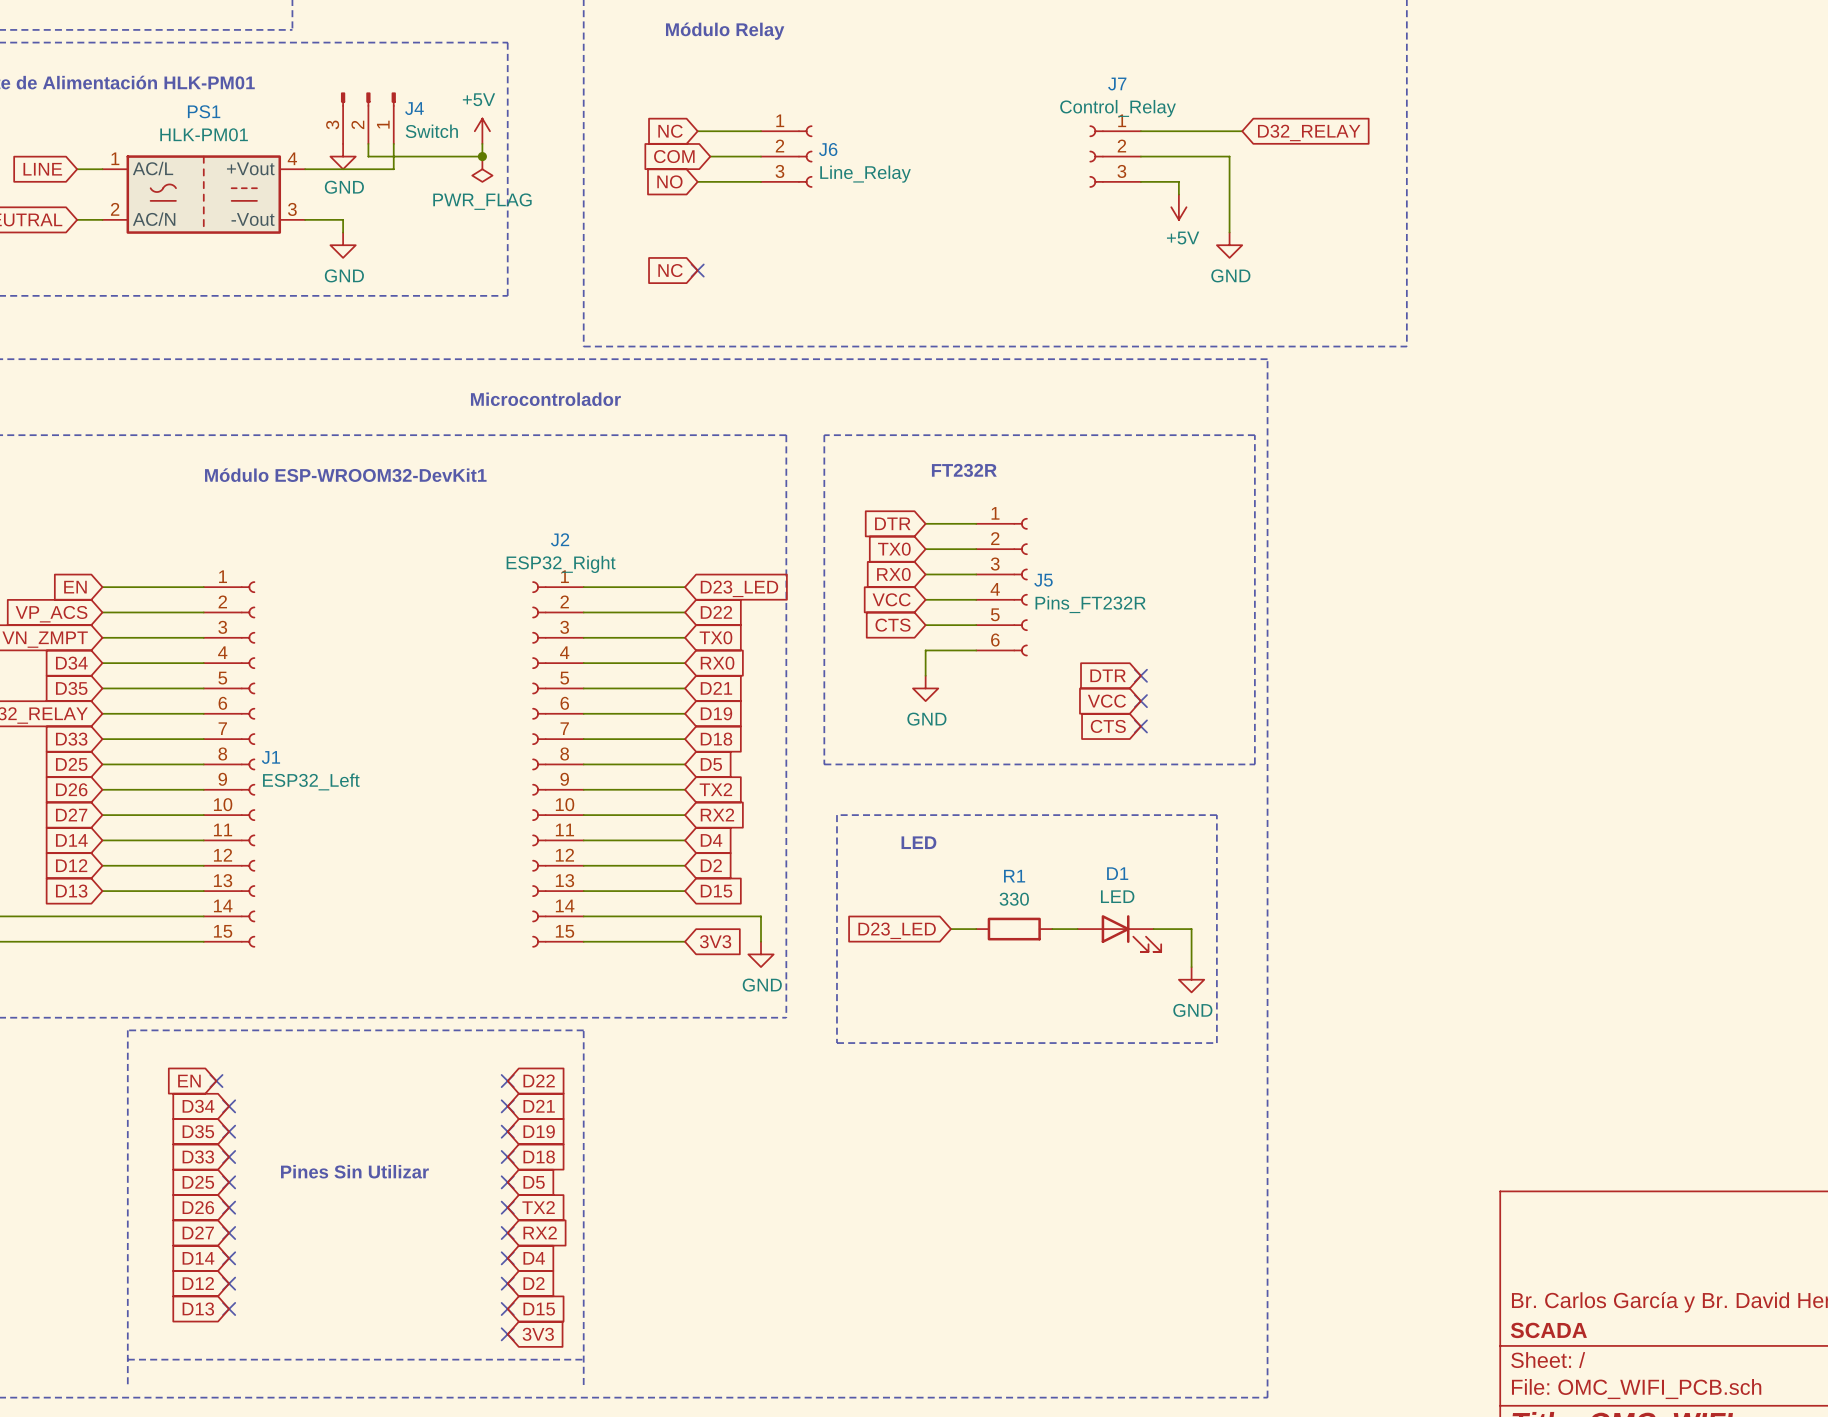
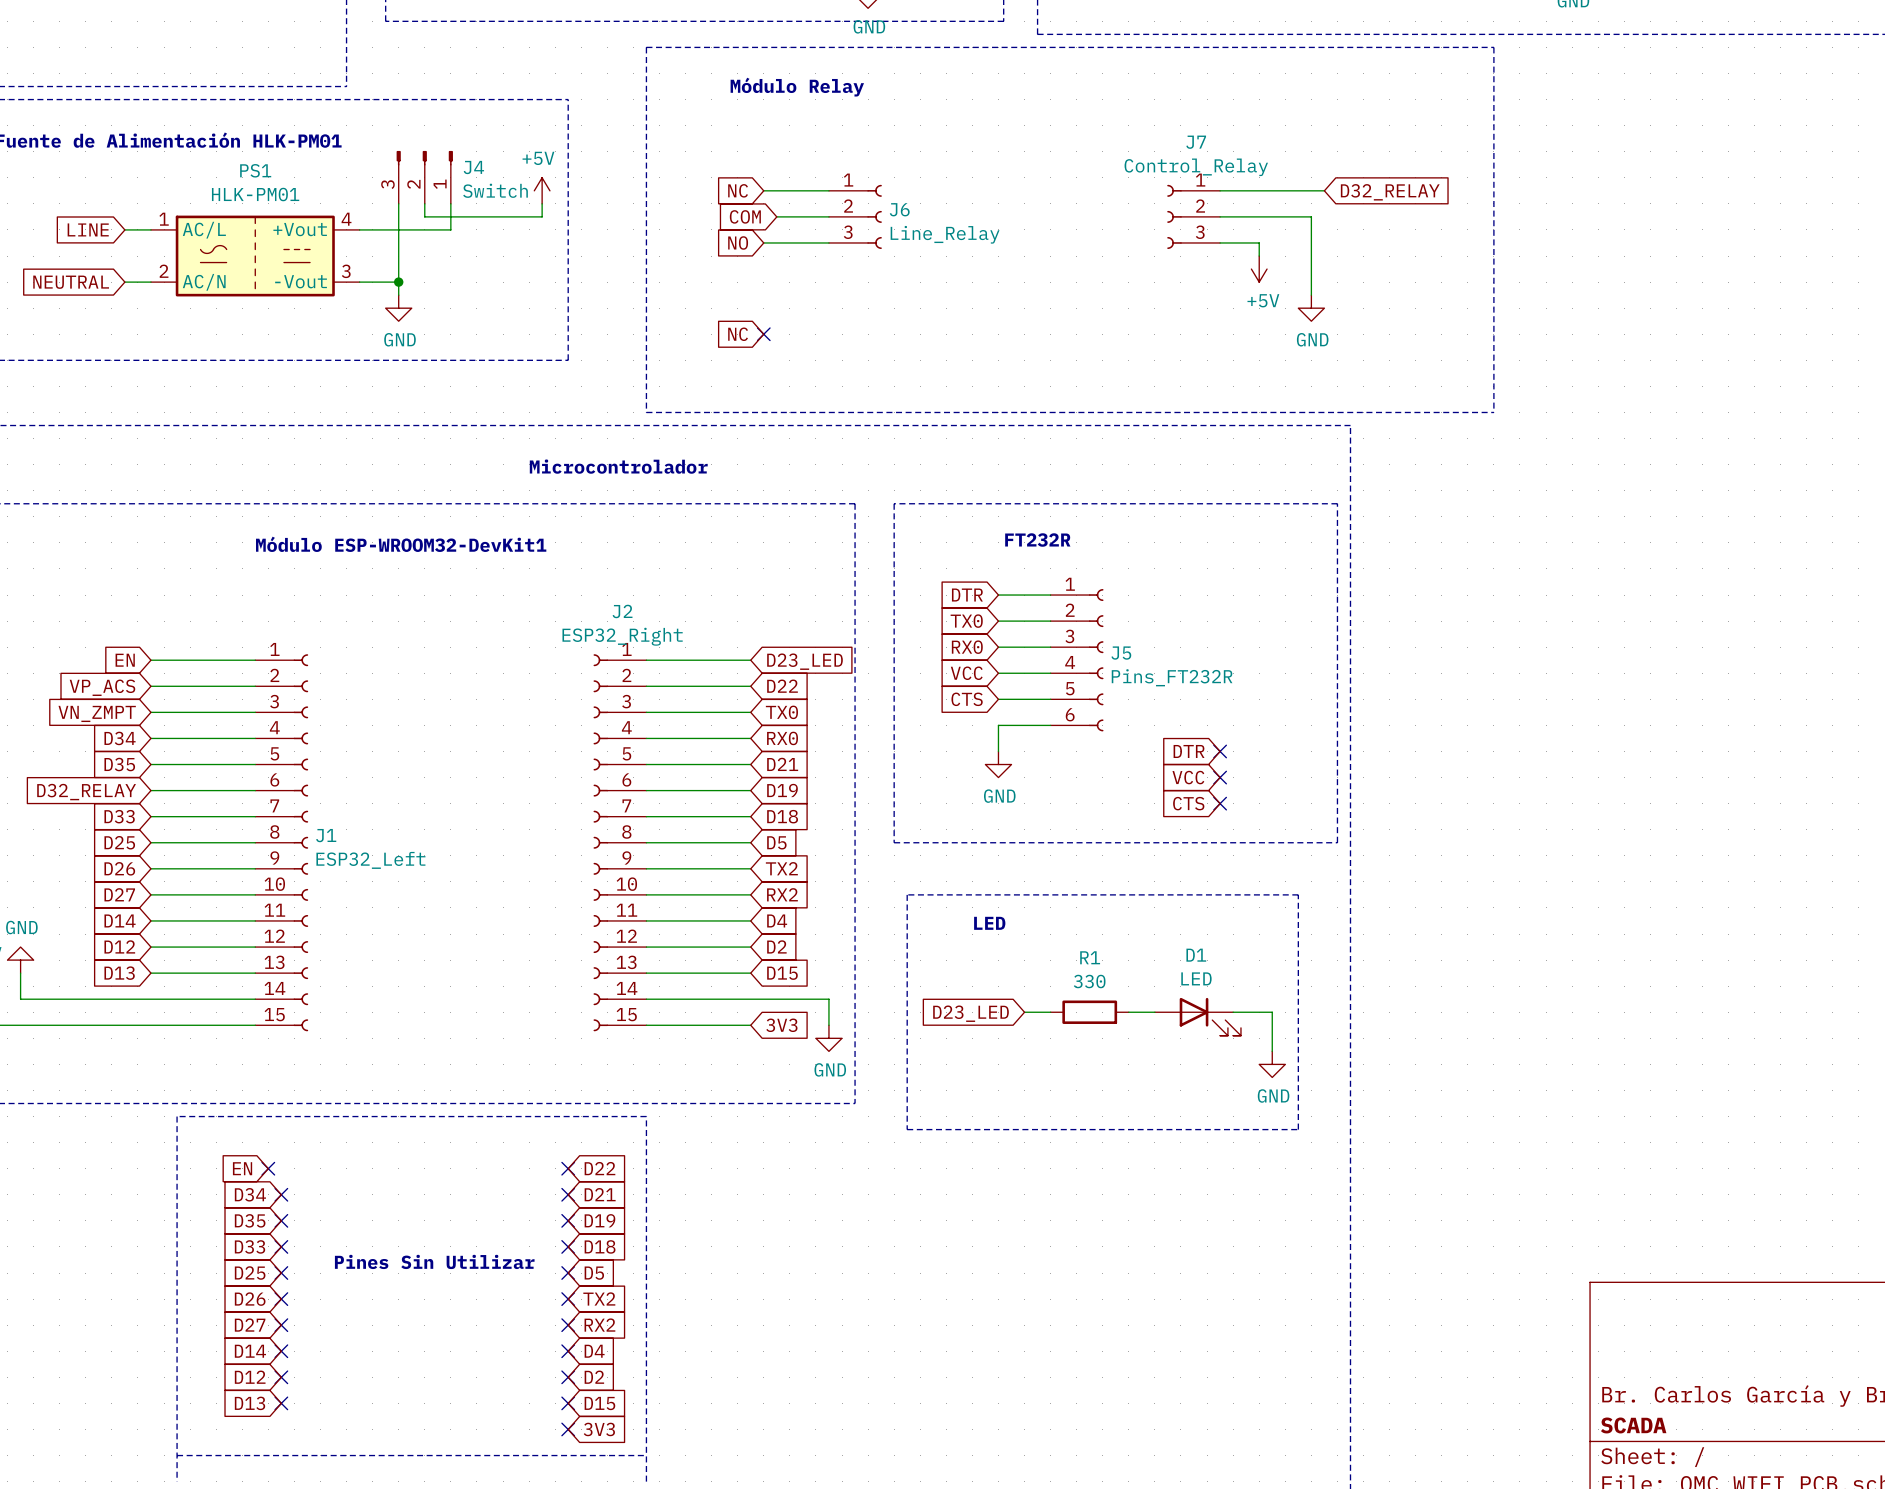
wire: none -> (398, 203) (398, 282)
power symbol: GND (343, 156) -> none
junction: (482, 156) -> none
power symbol: PWR_FLAG (482, 169) -> none
junction: none -> (398, 282)

